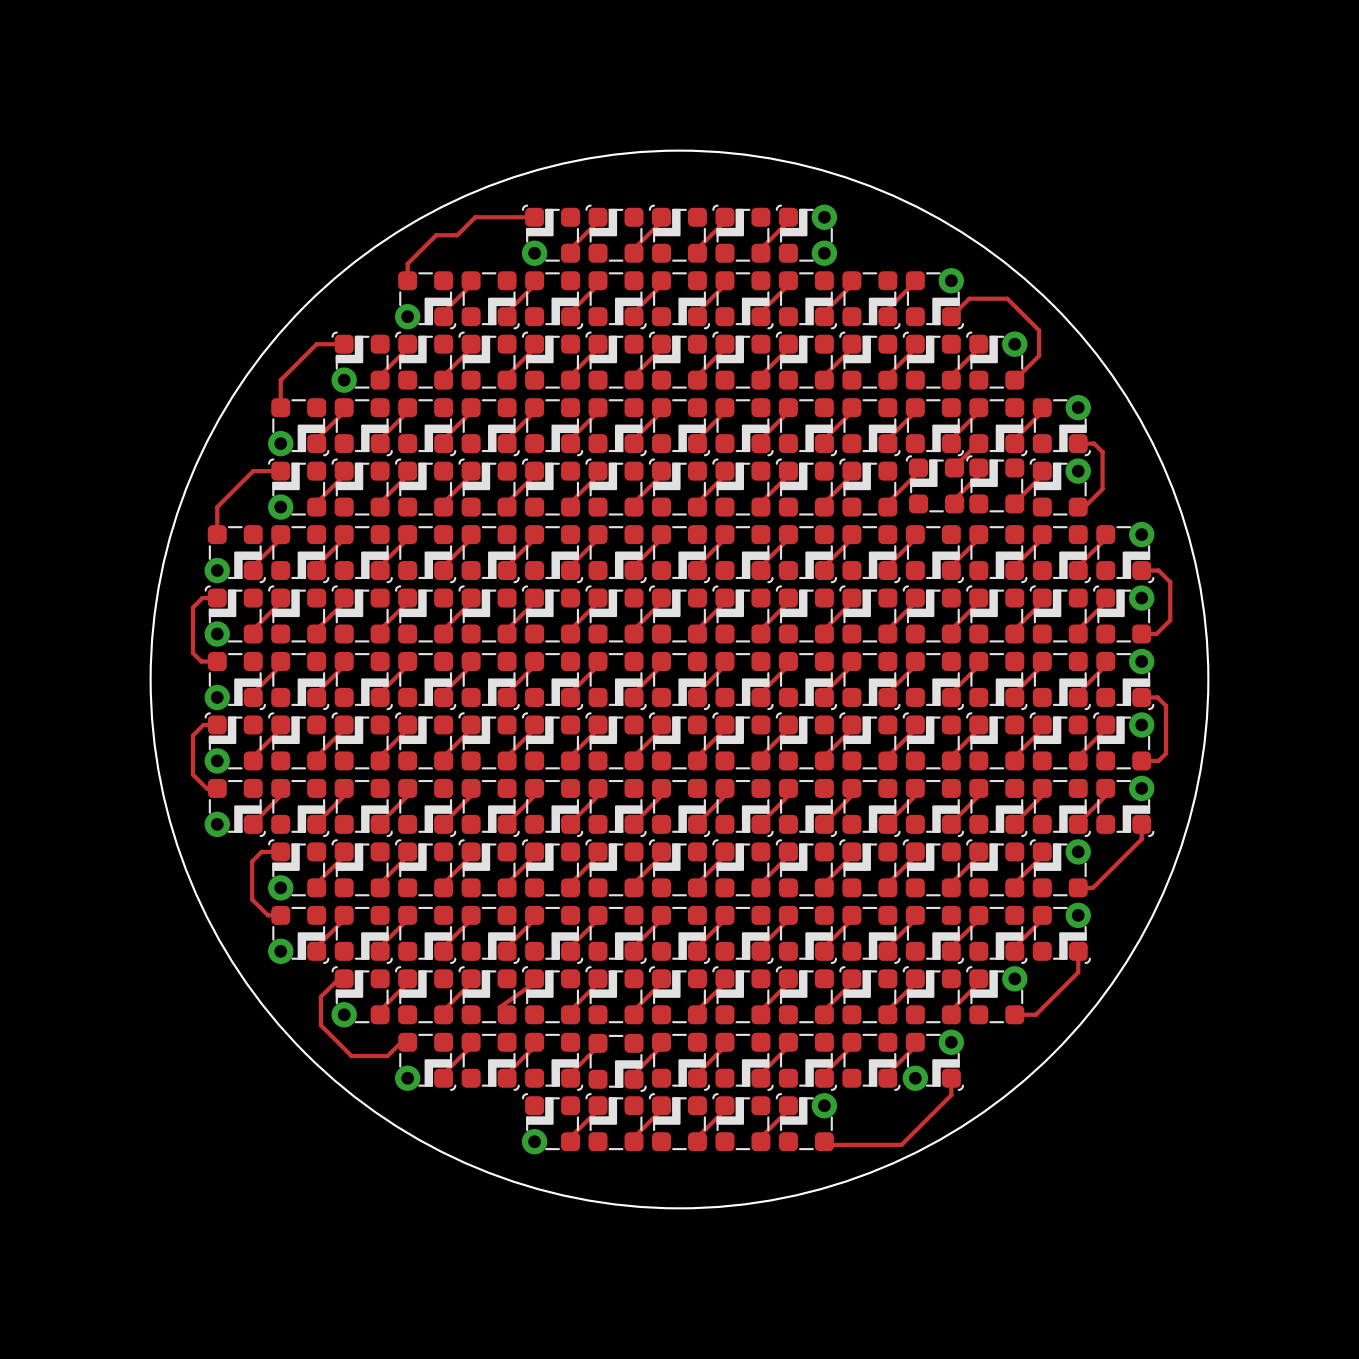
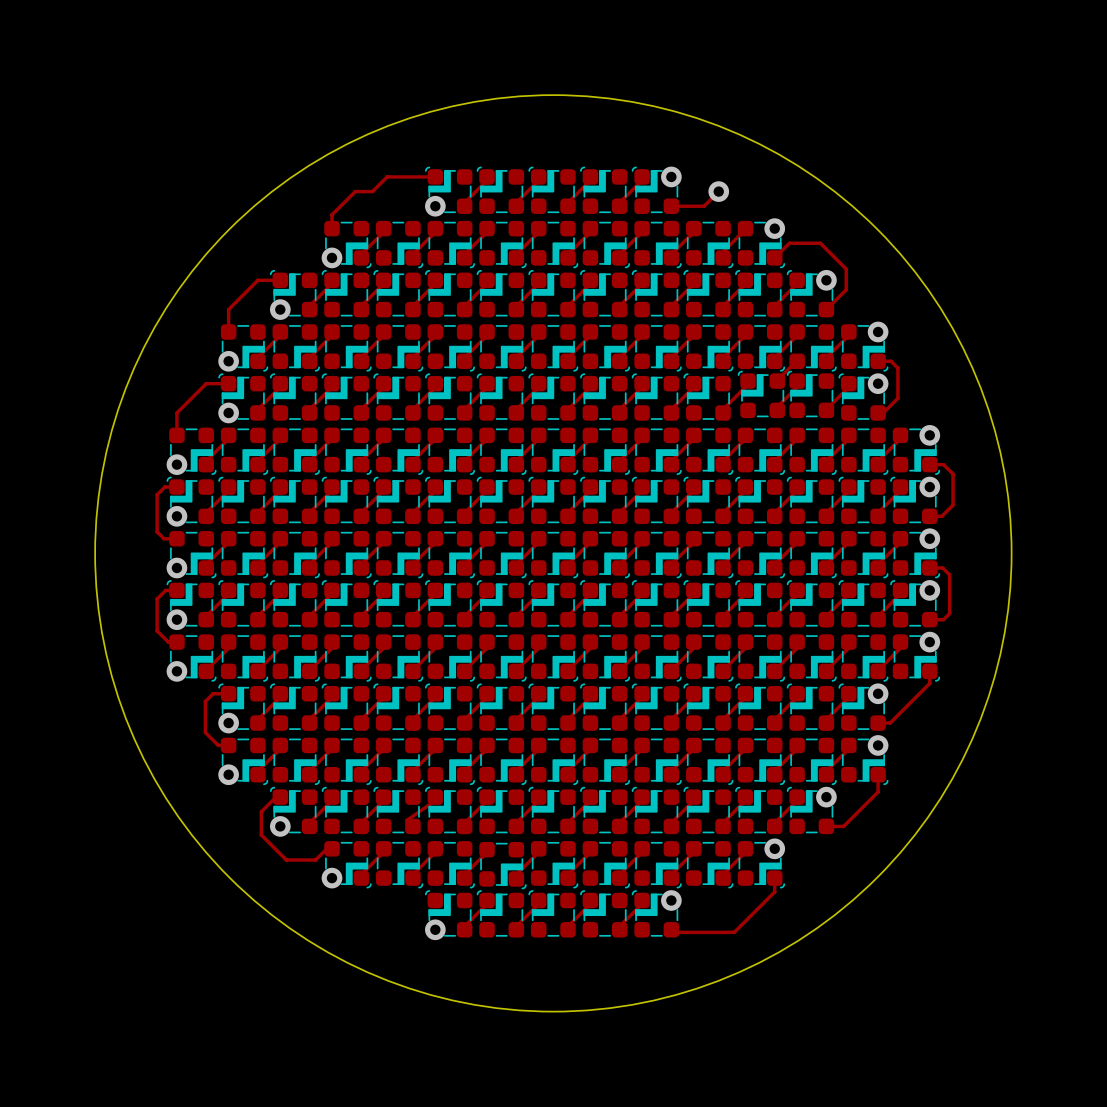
round board edge size: [149, 149, 1210, 1210] -> [94, 94, 1013, 1013]
track: none -> (718, 191) (704, 206) (671, 206)
via position: (824, 253) -> (718, 191)
via: (915, 1078) -> none

